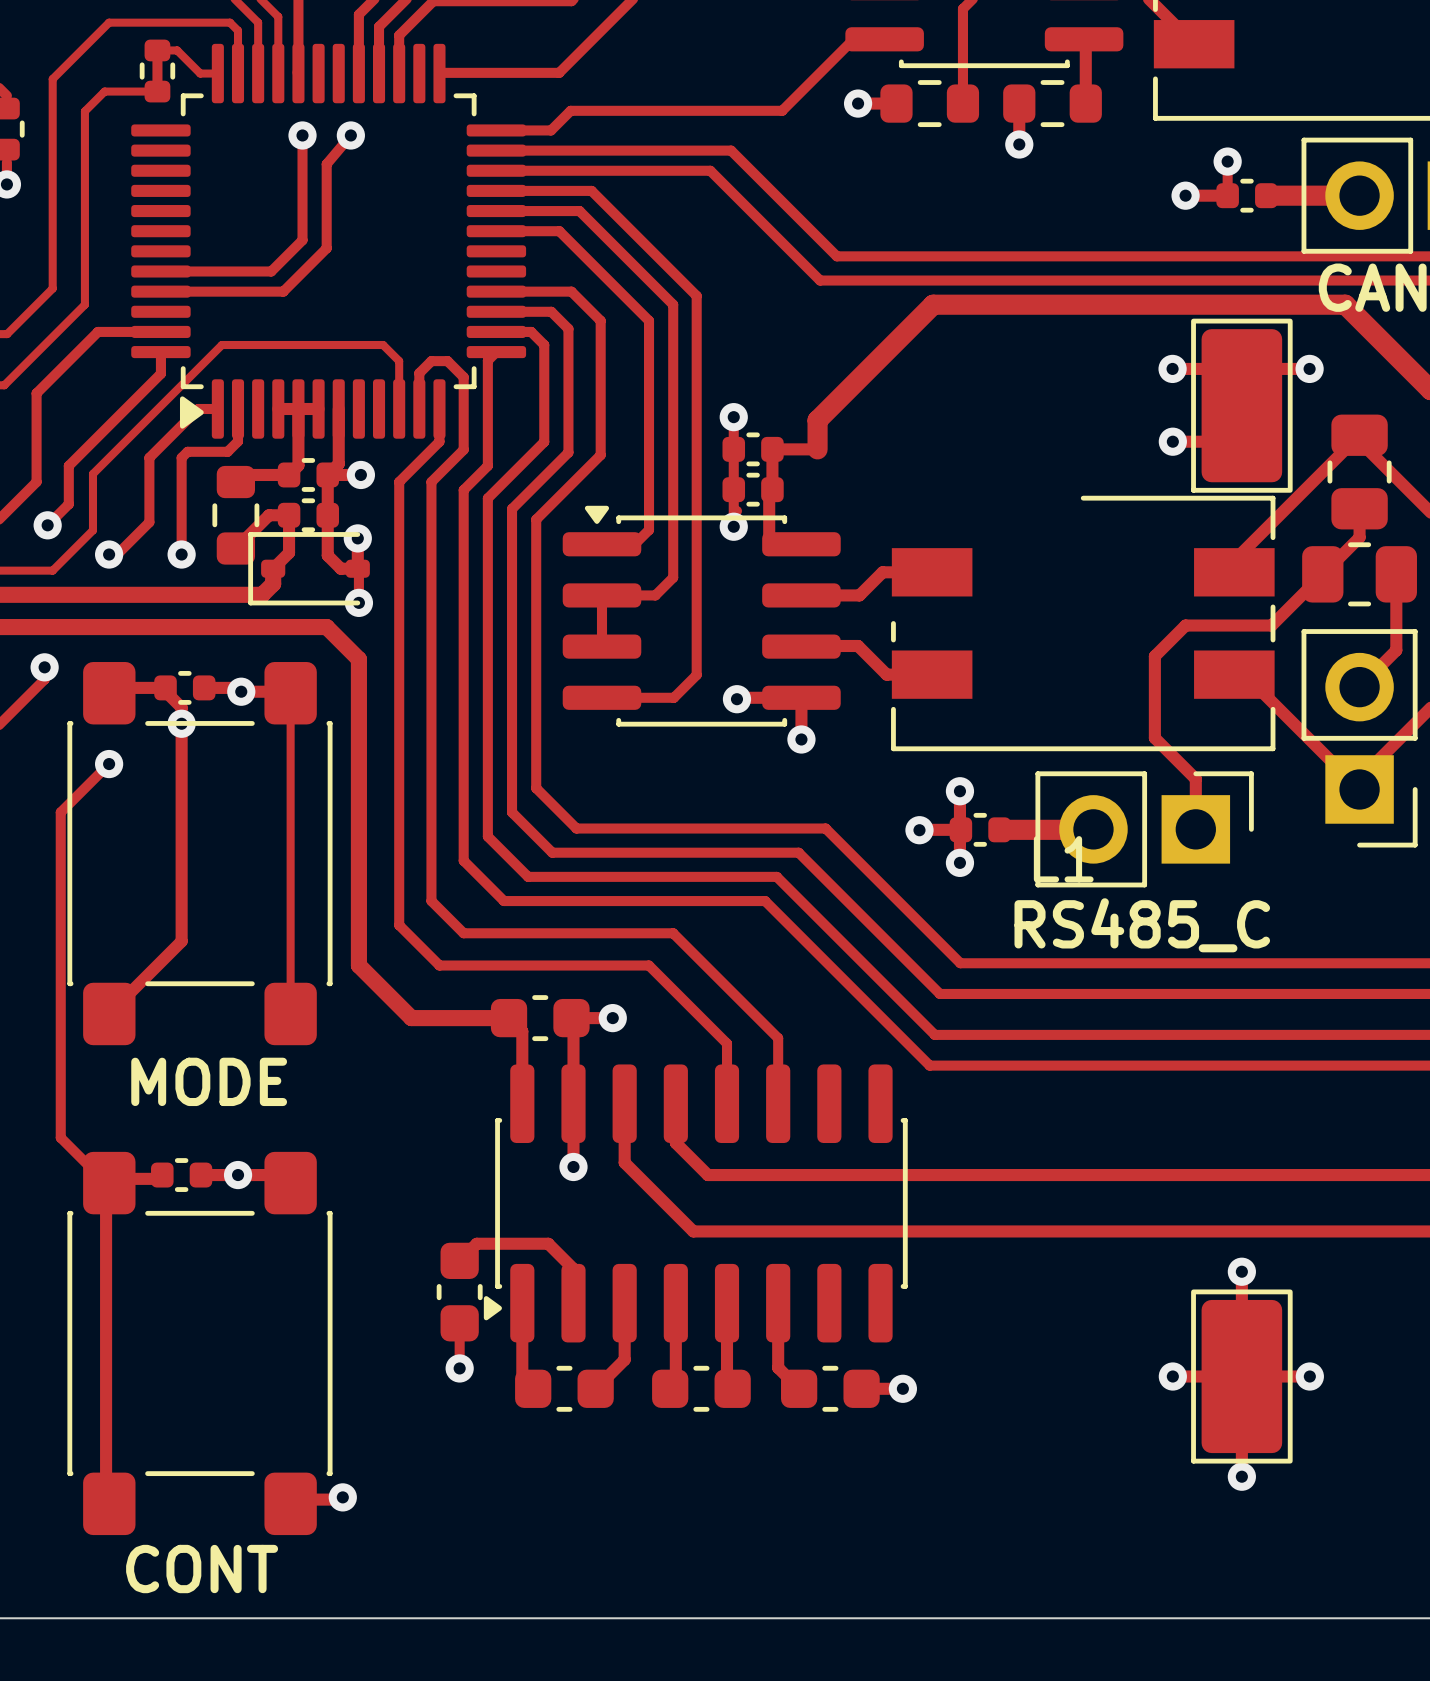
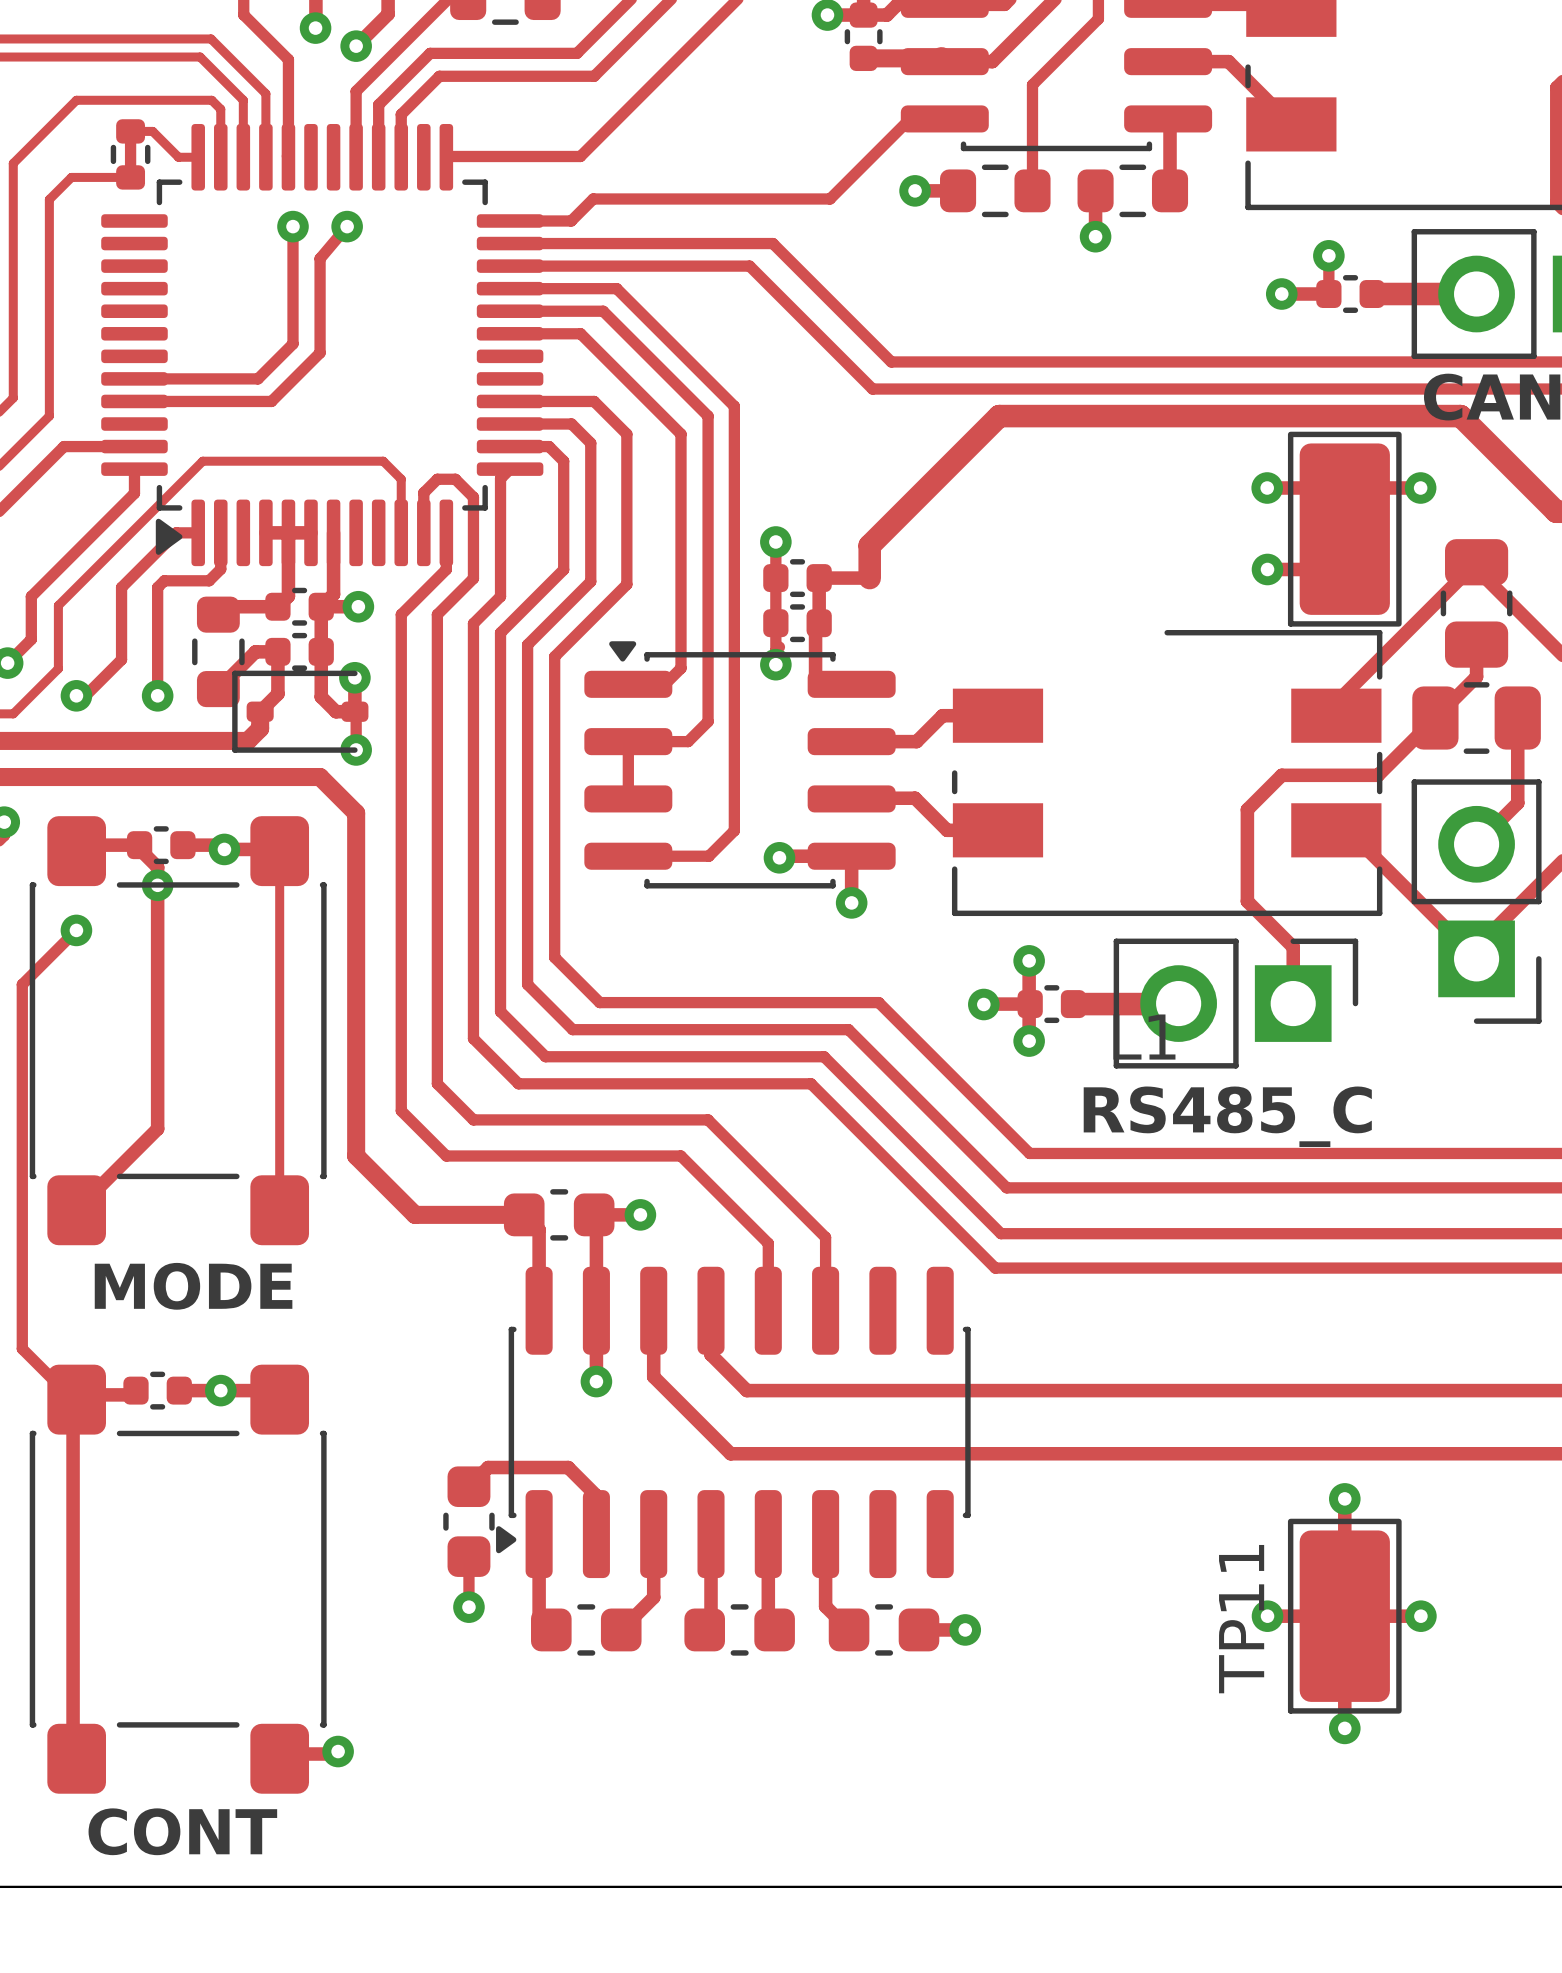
TP11 name: none -> TP11 (1241, 1619)

